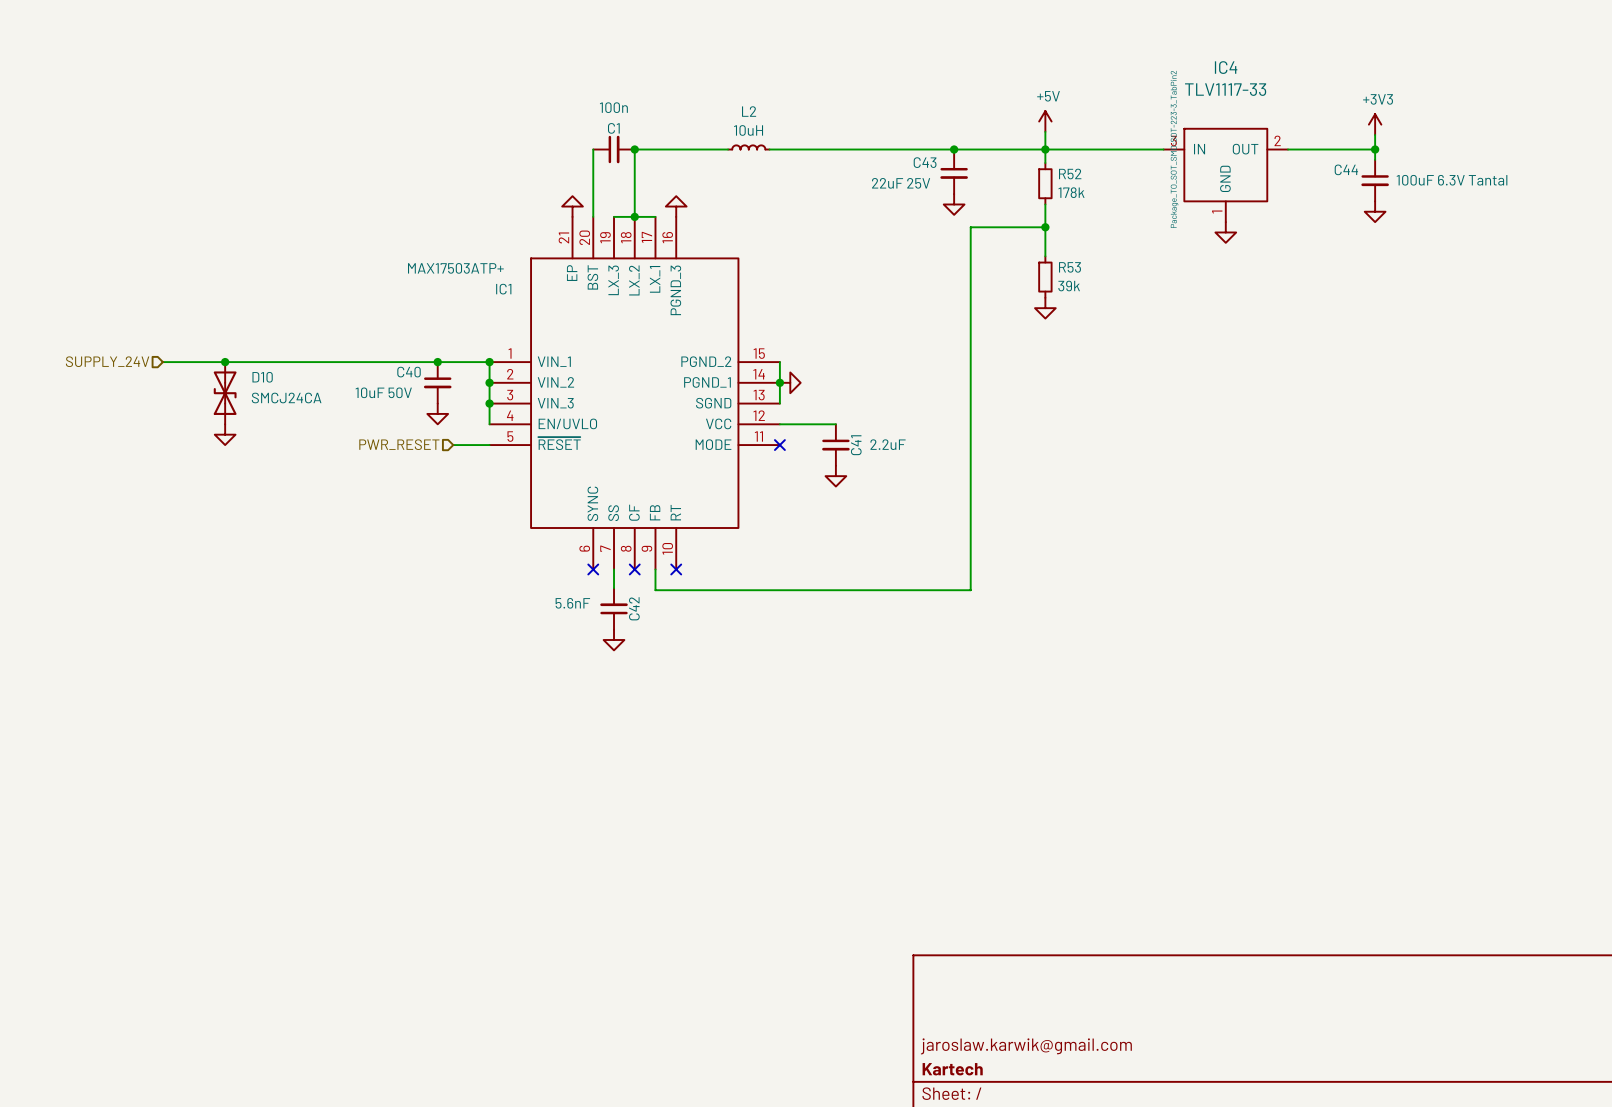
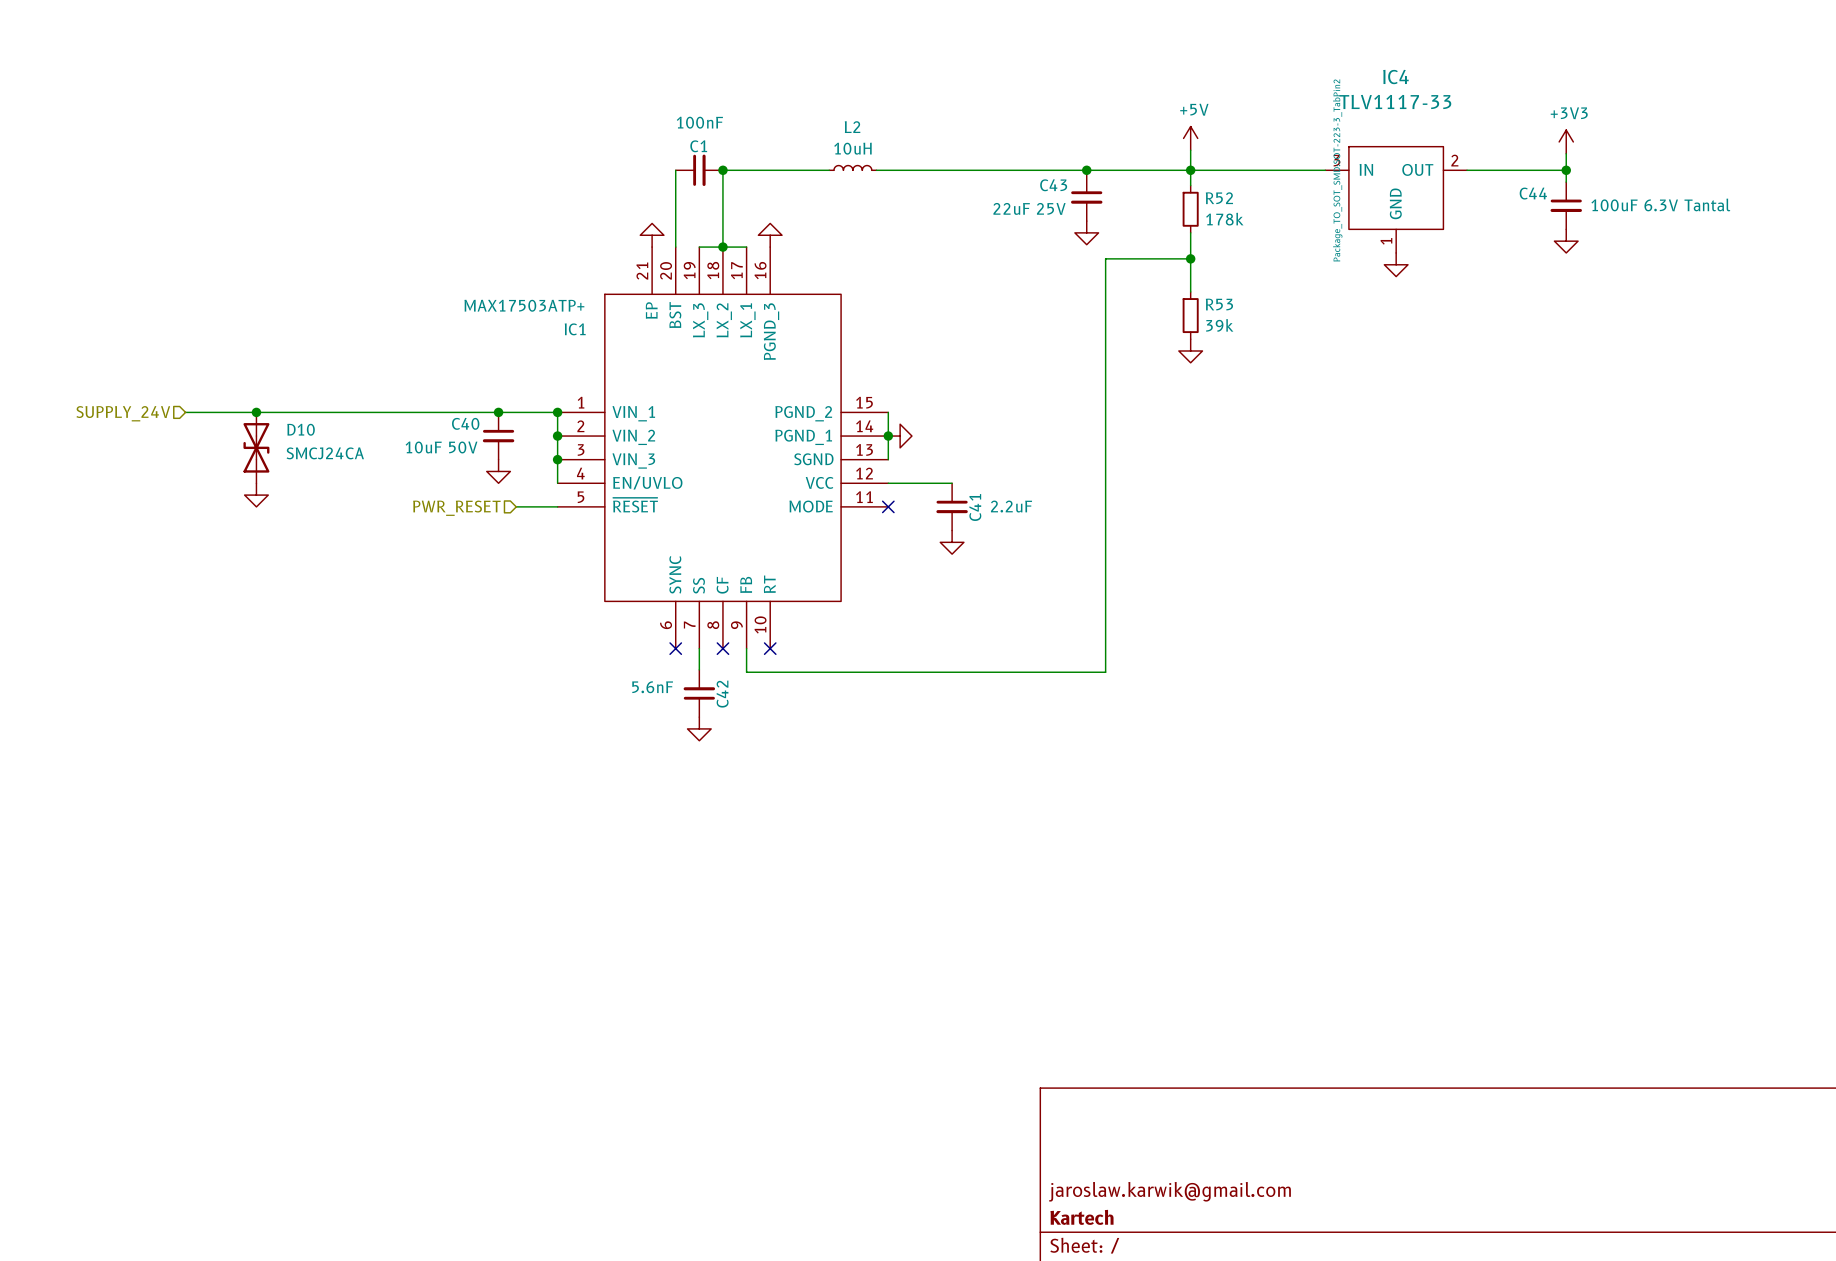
C1 value: 100n (613, 107) -> 100nF (699, 122)

